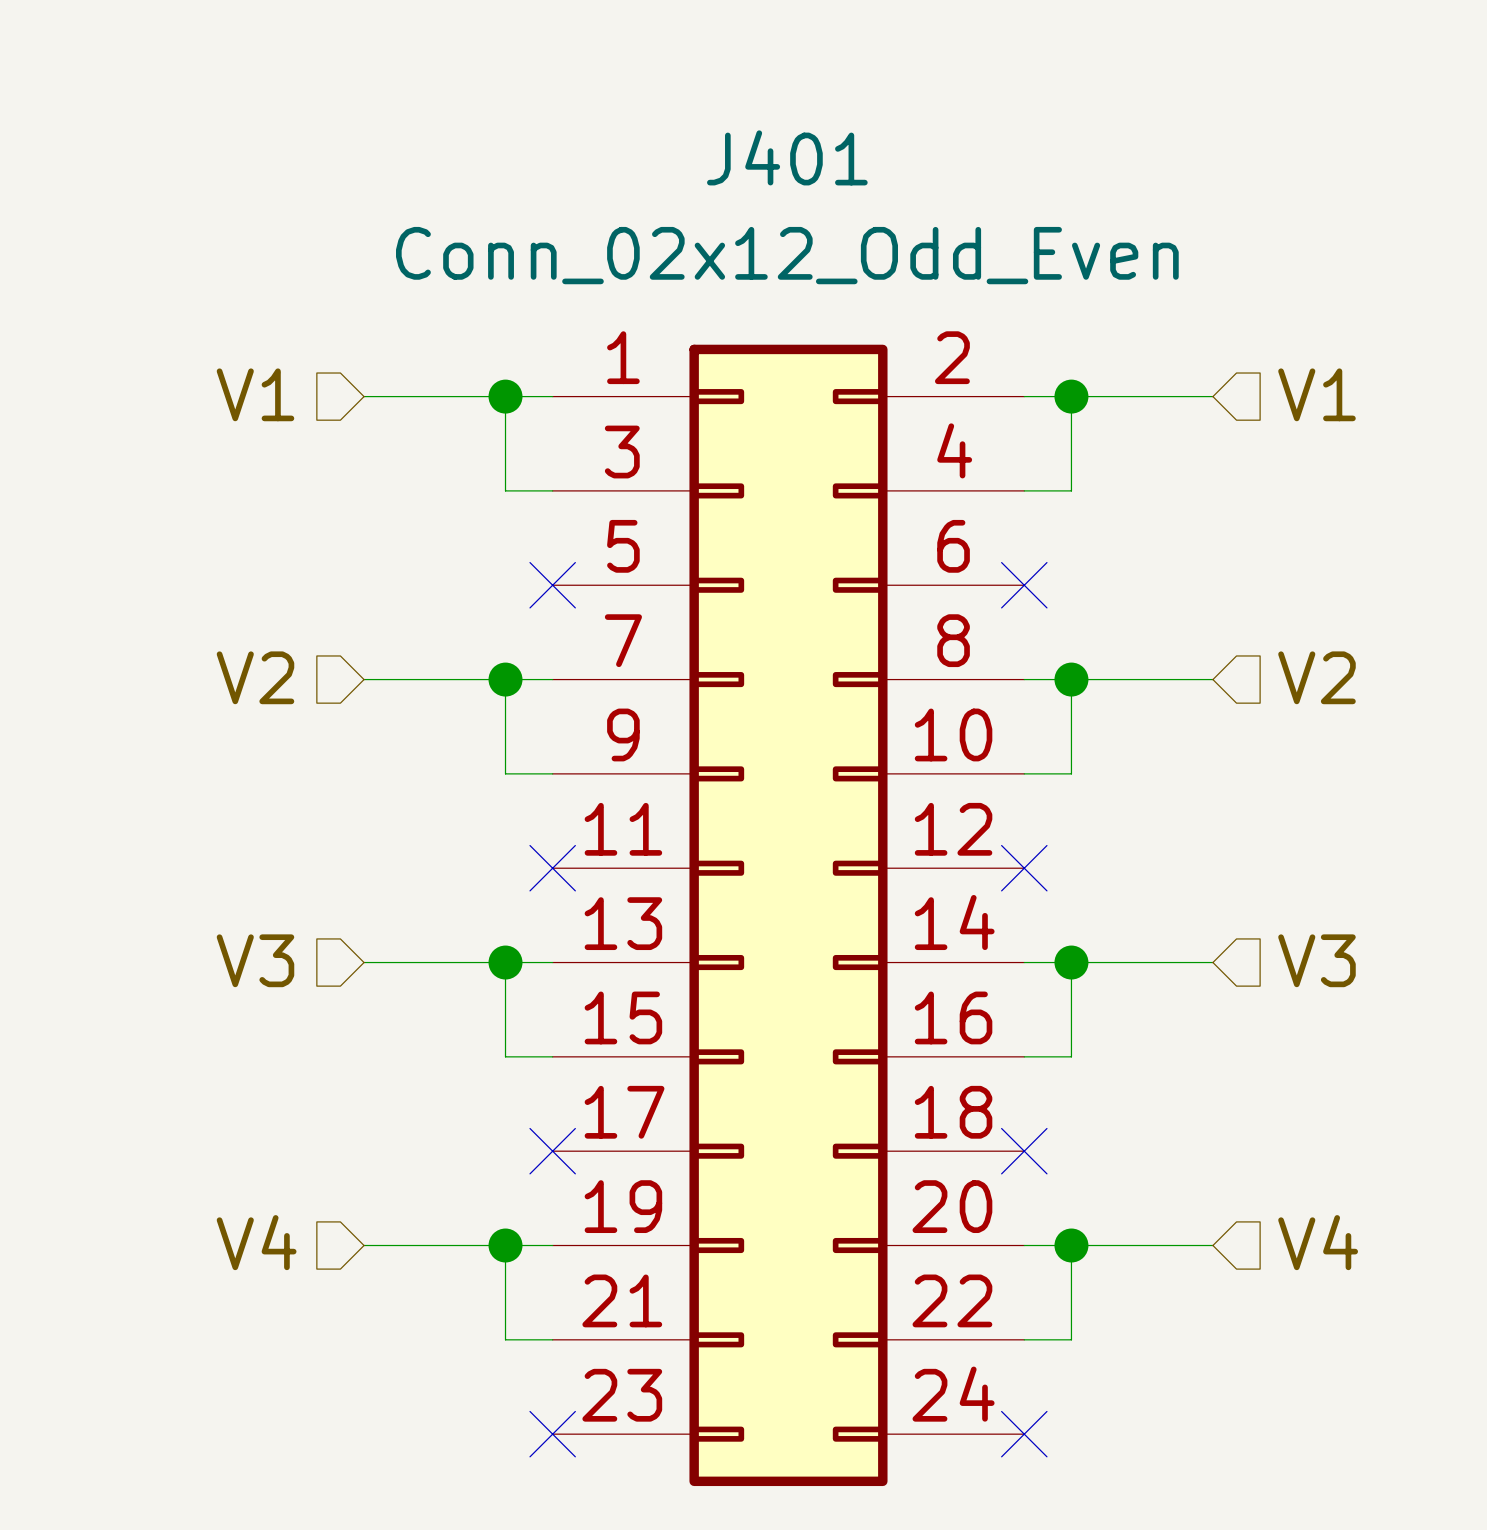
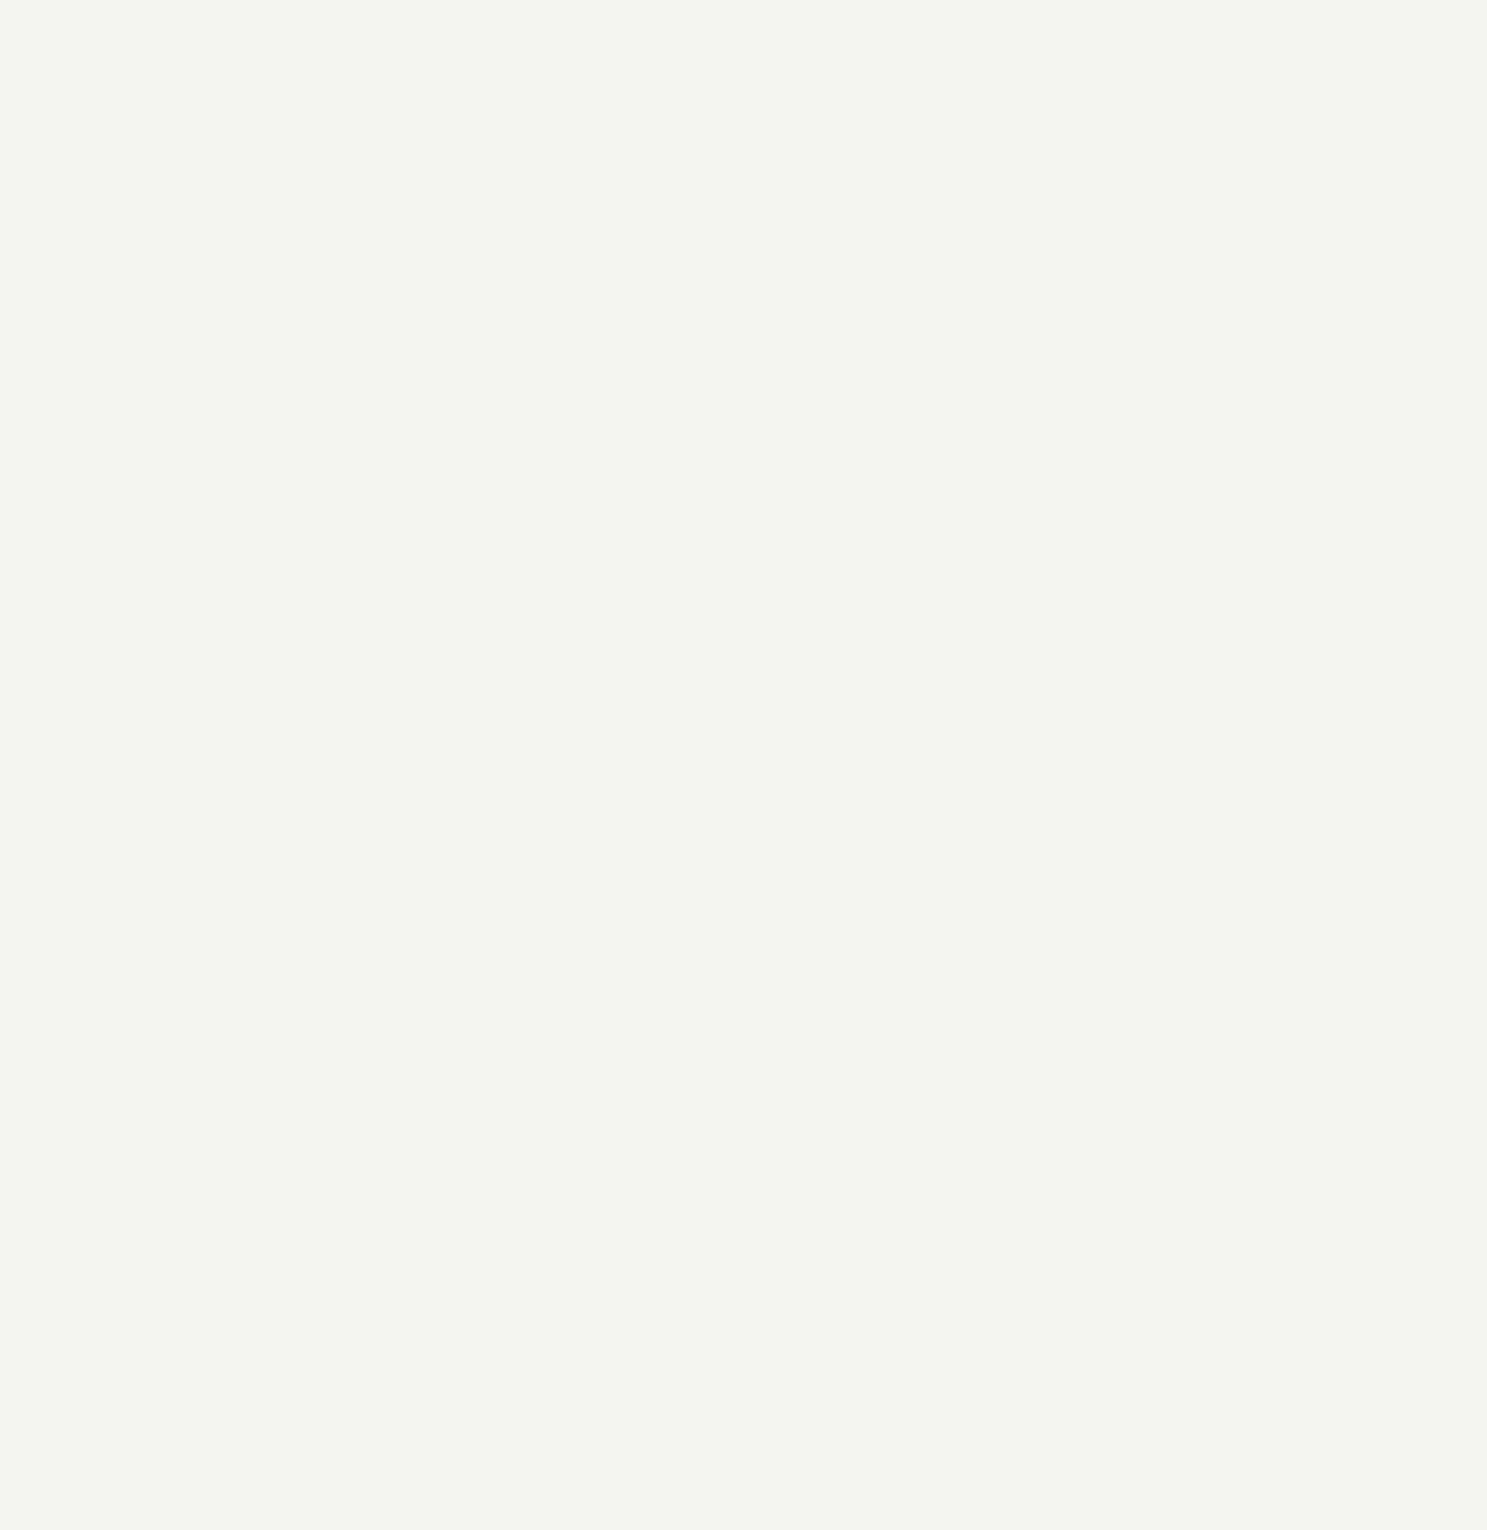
hierarchical label: V1 (255, 394) -> none
hierarchical label: V1 (1316, 394) -> none
wire: (364, 396) (552, 396) -> none
wire: (505, 396) (505, 490) (552, 490) -> none
junction: (505, 396) -> none
wire: (1024, 396) (1212, 396) -> none
wire: (1071, 396) (1071, 490) (1024, 490) -> none
junction: (1071, 396) -> none
no-connect mark: (552, 585) -> none
no-connect mark: (1024, 585) -> none
hierarchical label: V2 (255, 677) -> none
hierarchical label: V2 (1316, 677) -> none
wire: (364, 679) (552, 679) -> none
wire: (505, 679) (505, 773) (552, 773) -> none
junction: (505, 679) -> none
wire: (1024, 679) (1212, 679) -> none
wire: (1071, 679) (1071, 773) (1024, 773) -> none
junction: (1071, 679) -> none
no-connect mark: (552, 868) -> none
no-connect mark: (1024, 868) -> none
J401: Conn_02x12_Odd_Even (788, 915) -> none
hierarchical label: V3 (255, 960) -> none
hierarchical label: V3 (1316, 960) -> none
wire: (364, 962) (552, 962) -> none
wire: (505, 962) (505, 1056) (552, 1056) -> none
junction: (505, 962) -> none
wire: (1024, 962) (1212, 962) -> none
wire: (1071, 962) (1071, 1056) (1024, 1056) -> none
junction: (1071, 962) -> none
no-connect mark: (552, 1151) -> none
no-connect mark: (1024, 1151) -> none
hierarchical label: V4 (256, 1242) -> none
hierarchical label: V4 (1318, 1242) -> none
wire: (364, 1245) (552, 1245) -> none
wire: (505, 1245) (505, 1339) (552, 1339) -> none
junction: (505, 1245) -> none
wire: (1024, 1245) (1212, 1245) -> none
wire: (1071, 1245) (1071, 1339) (1024, 1339) -> none
junction: (1071, 1245) -> none
no-connect mark: (552, 1434) -> none
no-connect mark: (1024, 1434) -> none

